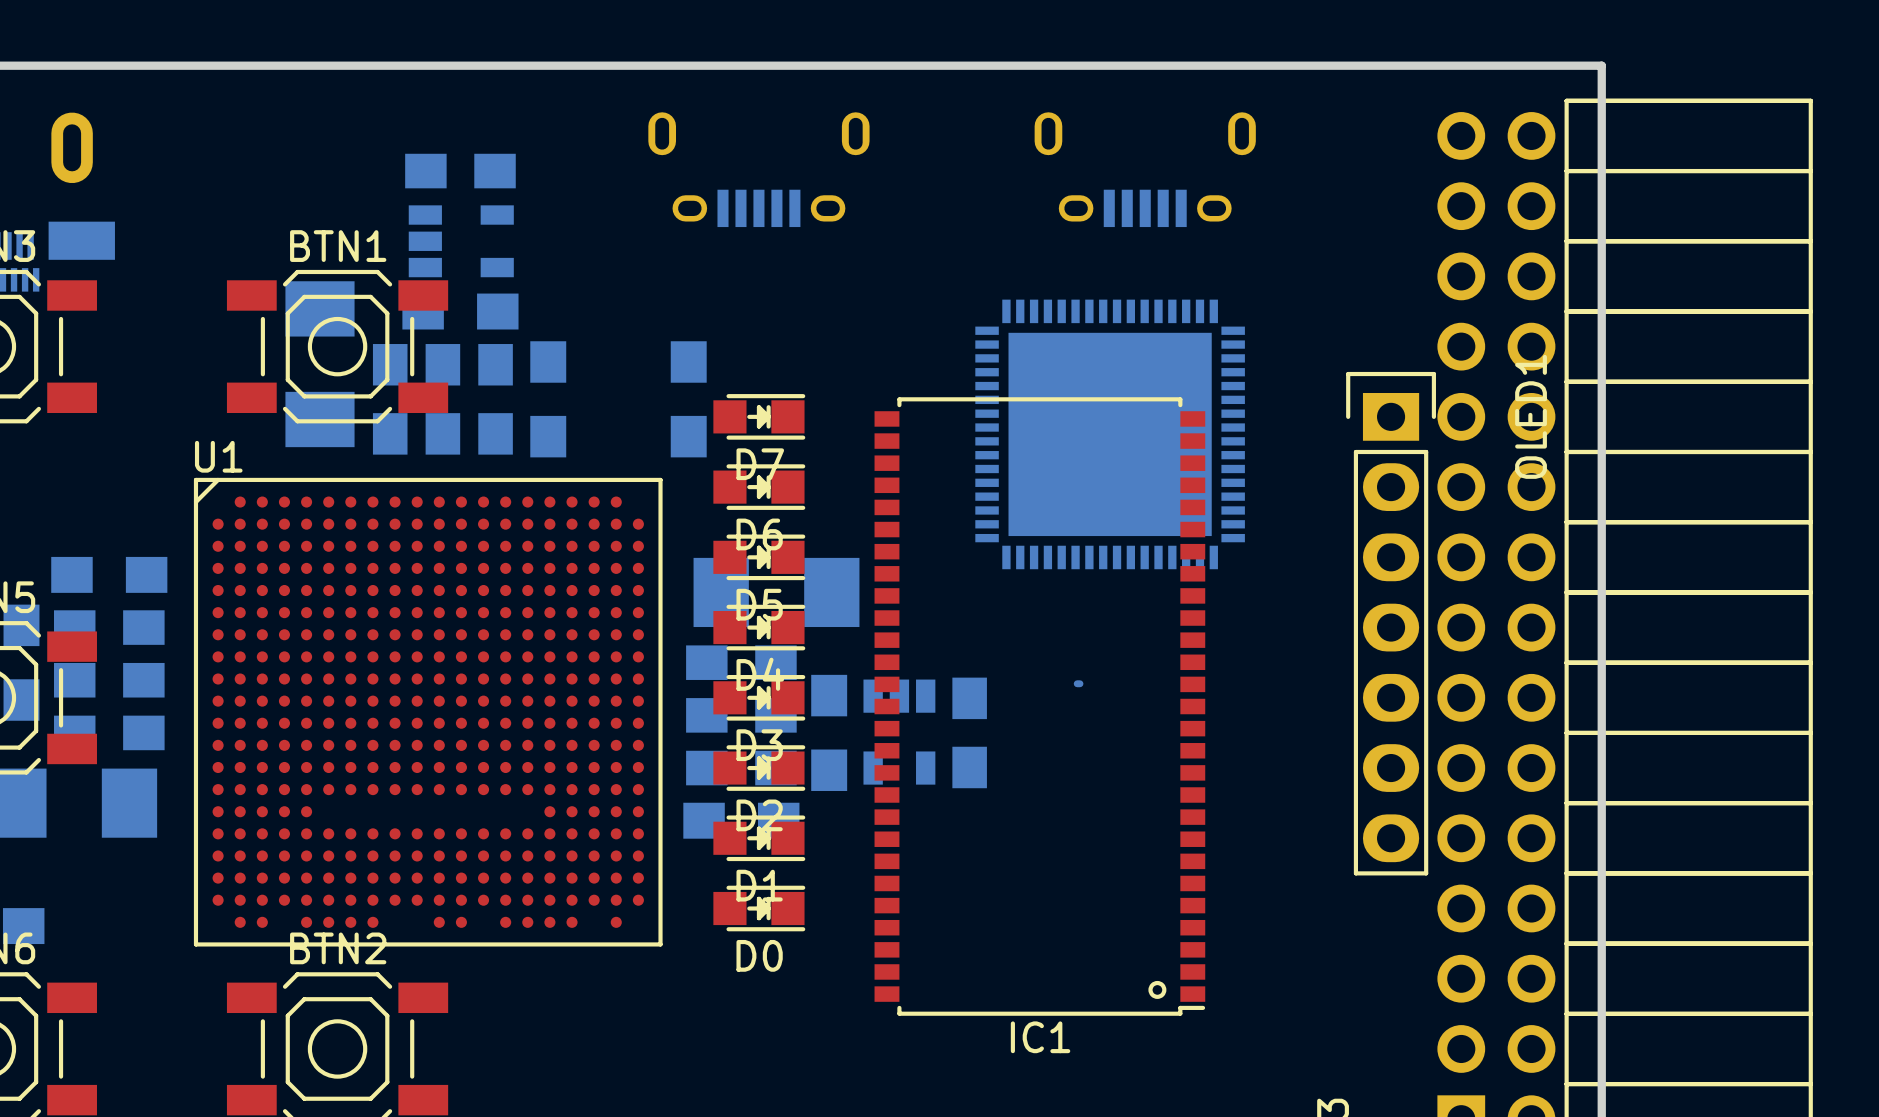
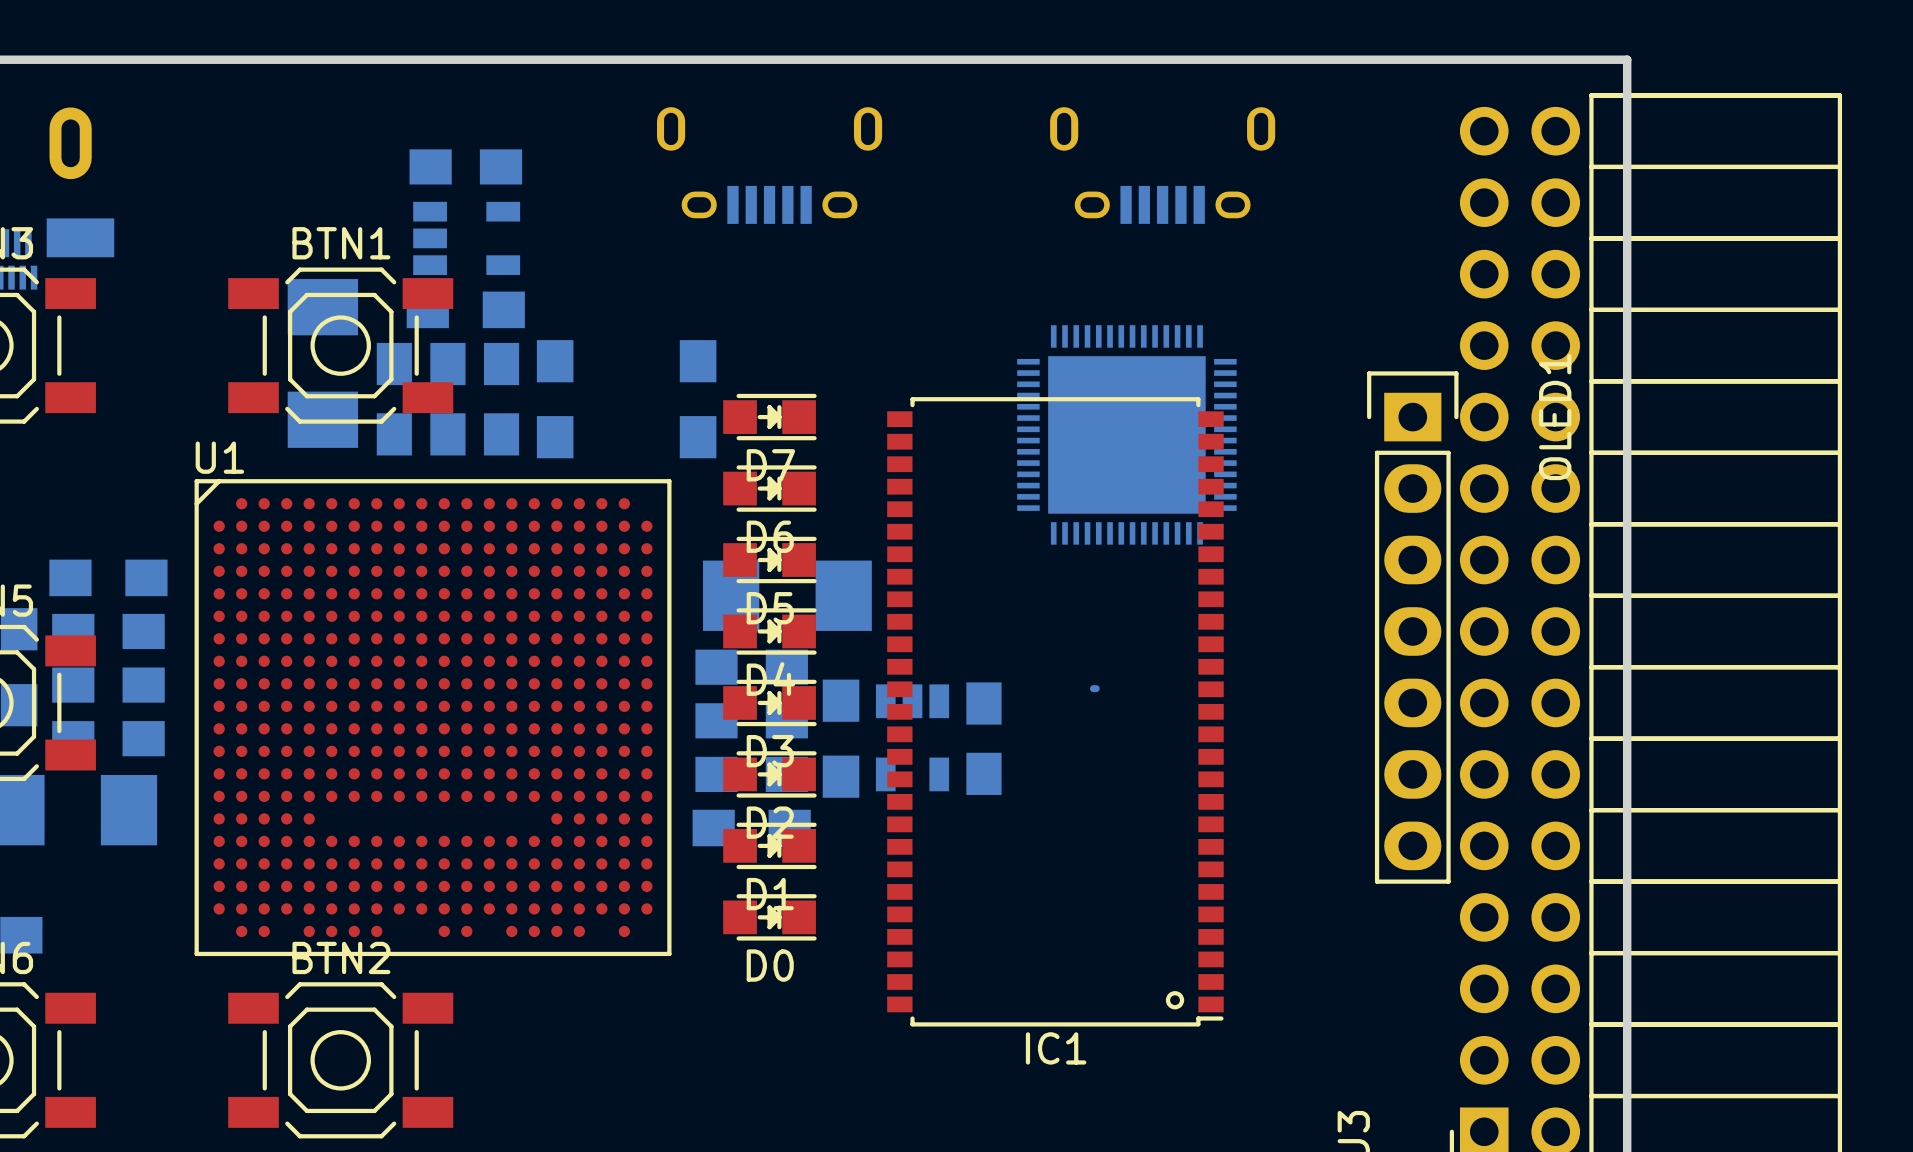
part footprint: [975, 299, 1245, 570] -> [1017, 325, 1237, 545]

